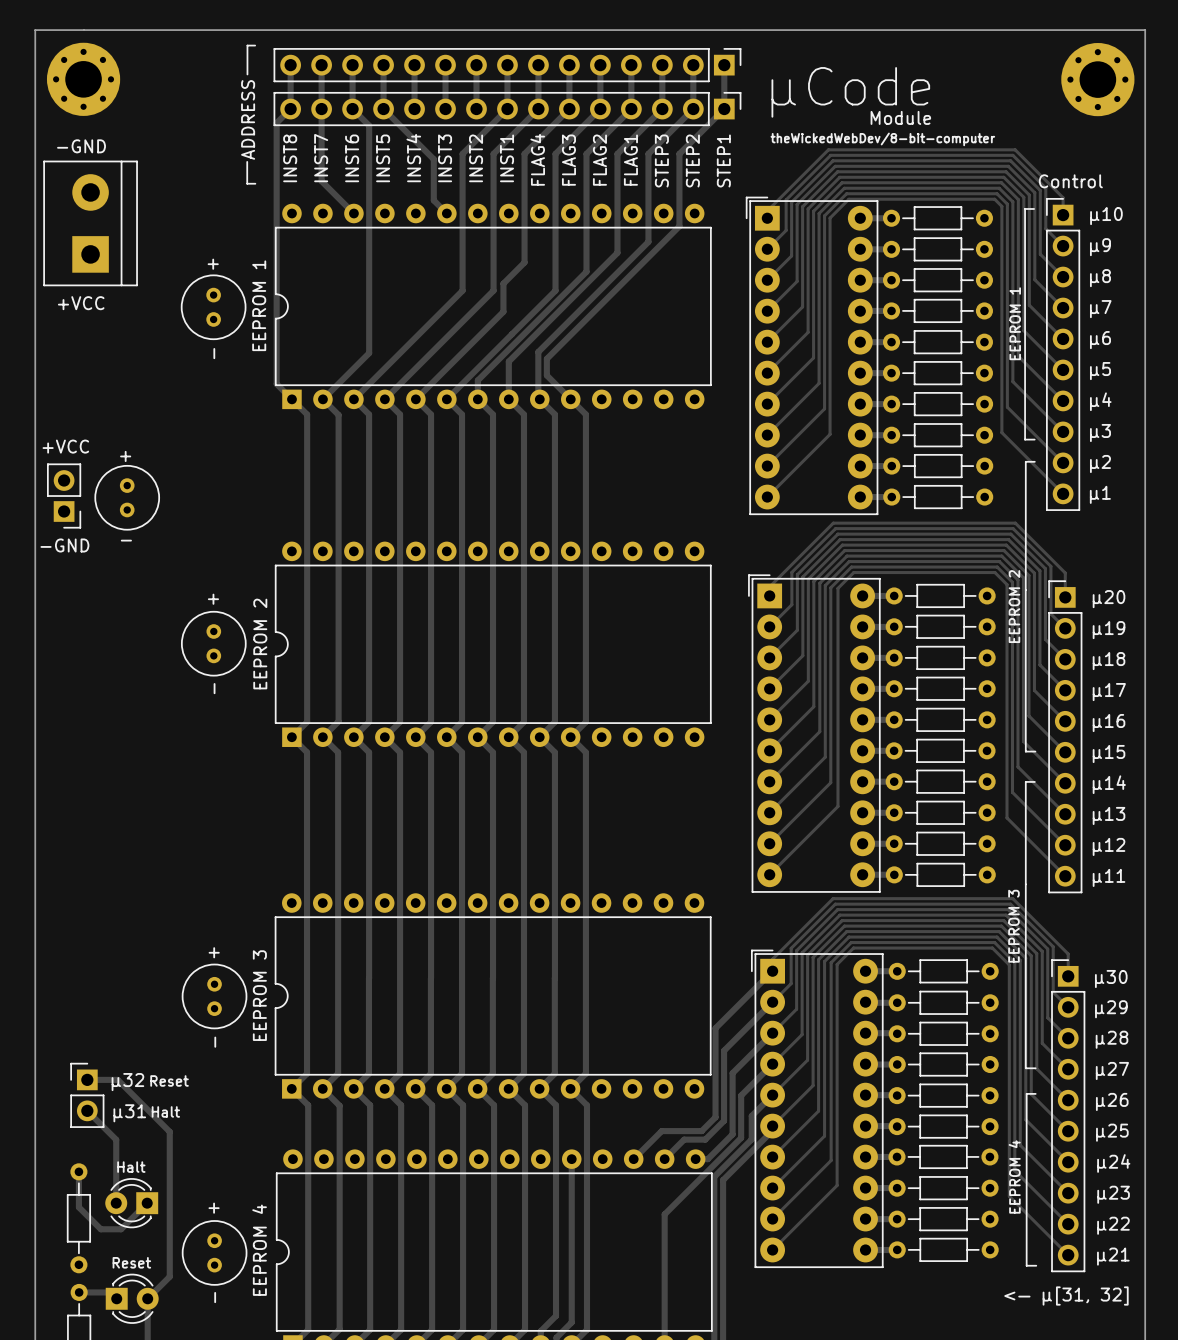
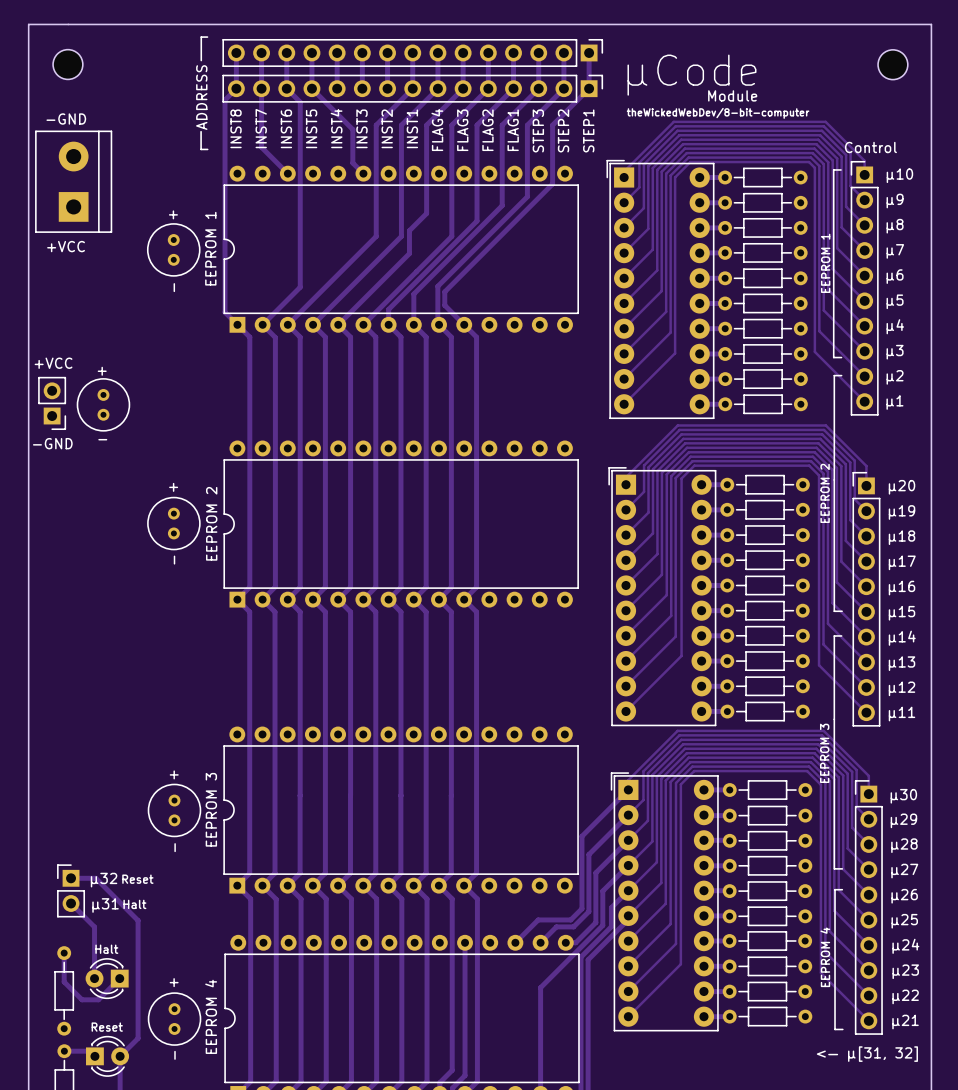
part footprint: [46, 42, 121, 116] -> [53, 49, 83, 80]
part footprint: [1061, 43, 1135, 117] -> [878, 49, 908, 80]

